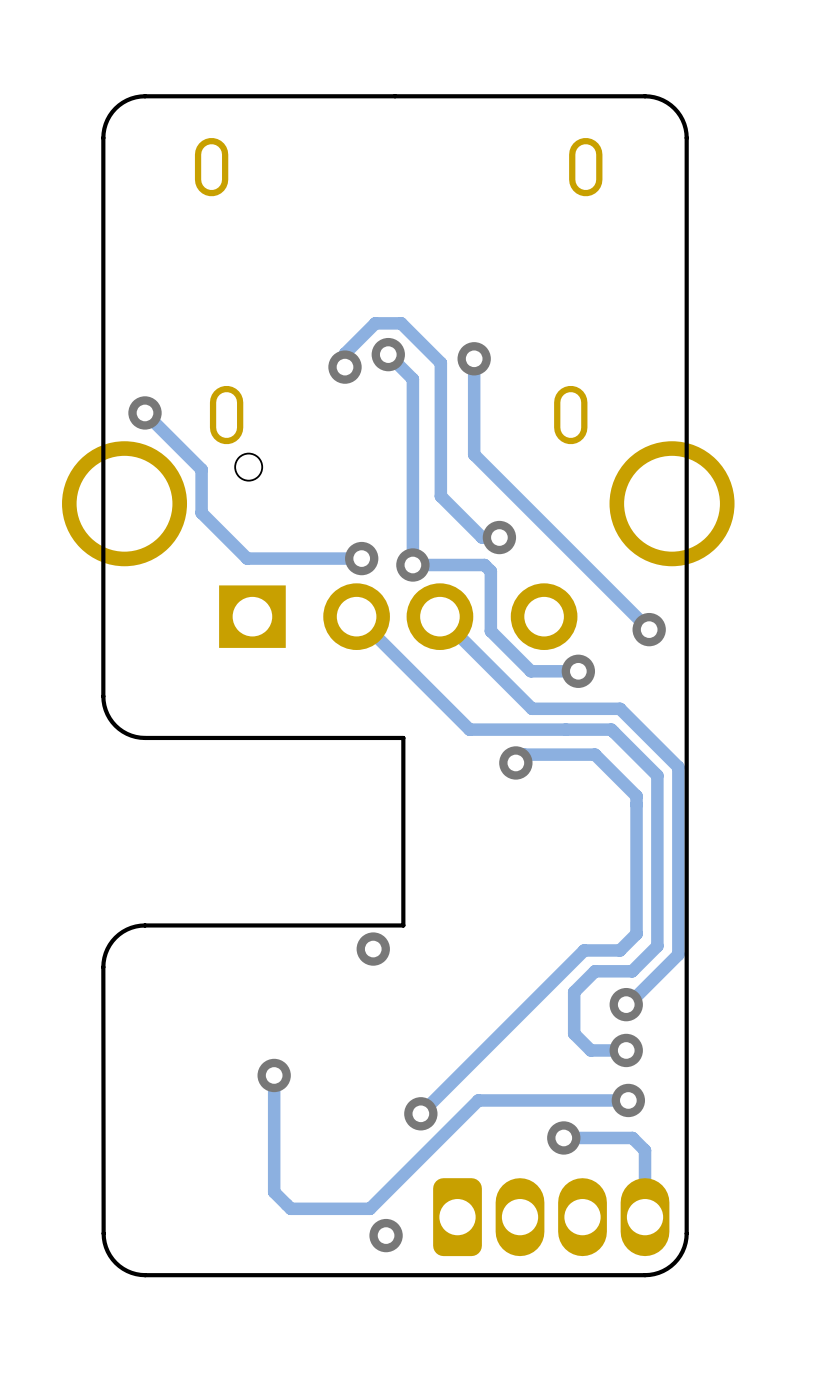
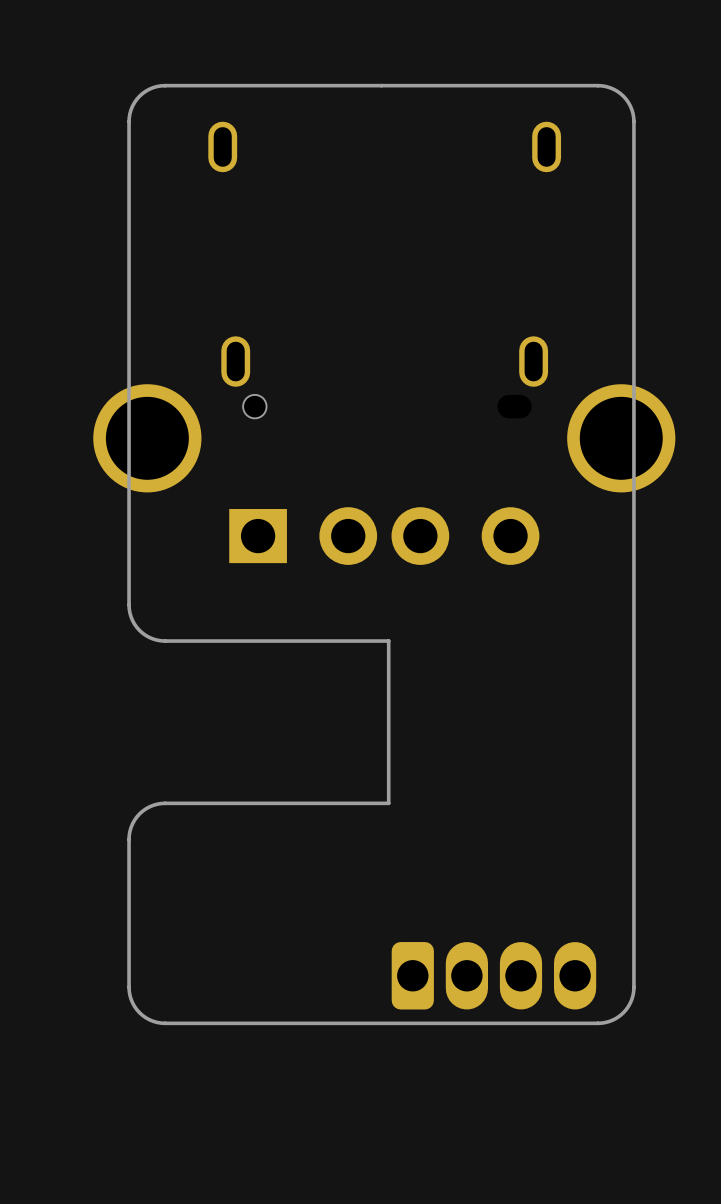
track: (388, 354) (412, 379) (412, 565) (484, 565) (490, 571) (490, 631) (530, 671) (578, 671) -> none
via: (388, 354) -> none
track: (474, 358) (474, 454) (649, 629) -> none
via: (474, 358) -> none
track: (345, 367) (345, 353) (375, 323) (401, 323) (440, 362) (440, 496) (482, 537) (499, 537) -> none
via: (345, 367) -> none
track: (145, 412) (201, 469) (201, 512) (247, 558) (361, 558) -> none
via: (145, 412) -> none
via: (499, 537) -> none
via: (361, 558) -> none
via: (412, 565) -> none
track: (356, 616) (469, 729) (611, 729) (657, 775) (657, 946) (632, 971) (595, 971) (574, 992) (574, 1033) (590, 1050) (626, 1050) -> none
track: (439, 616) (532, 708) (620, 708) (678, 767) (678, 954) (626, 1004) -> none
via: (649, 629) -> none
via: (578, 671) -> none
track: (515, 762) (524, 754) (595, 754) (636, 796) (636, 933) (620, 950) (584, 950) (420, 1113) -> none
via: (515, 762) -> none
via: (373, 949) -> none
board edge: (103, 967) (103, 1238) (107, 1251) (119, 1266) (131, 1272) (145, 1275) -> none
via: (626, 1004) -> none
via: (626, 1050) -> none
track: (274, 1075) (274, 1192) (290, 1208) (370, 1208) (478, 1100) (628, 1100) -> none
via: (274, 1075) -> none
via: (628, 1100) -> none
via: (420, 1113) -> none
track: (563, 1137) (632, 1137) (645, 1150) (645, 1217) -> none
via: (563, 1137) -> none
board edge: (686, 1137) (685, 1242) (680, 1255) (674, 1262) (667, 1268) (654, 1274) (145, 1275) -> (633, 987) (631, 999) (626, 1009) (613, 1019) (601, 1023) (165, 1023) (153, 1021) (136, 1009) (129, 991) (129, 839)
part position: (551, 1217) -> (493, 975)
via: (386, 1235) -> none

